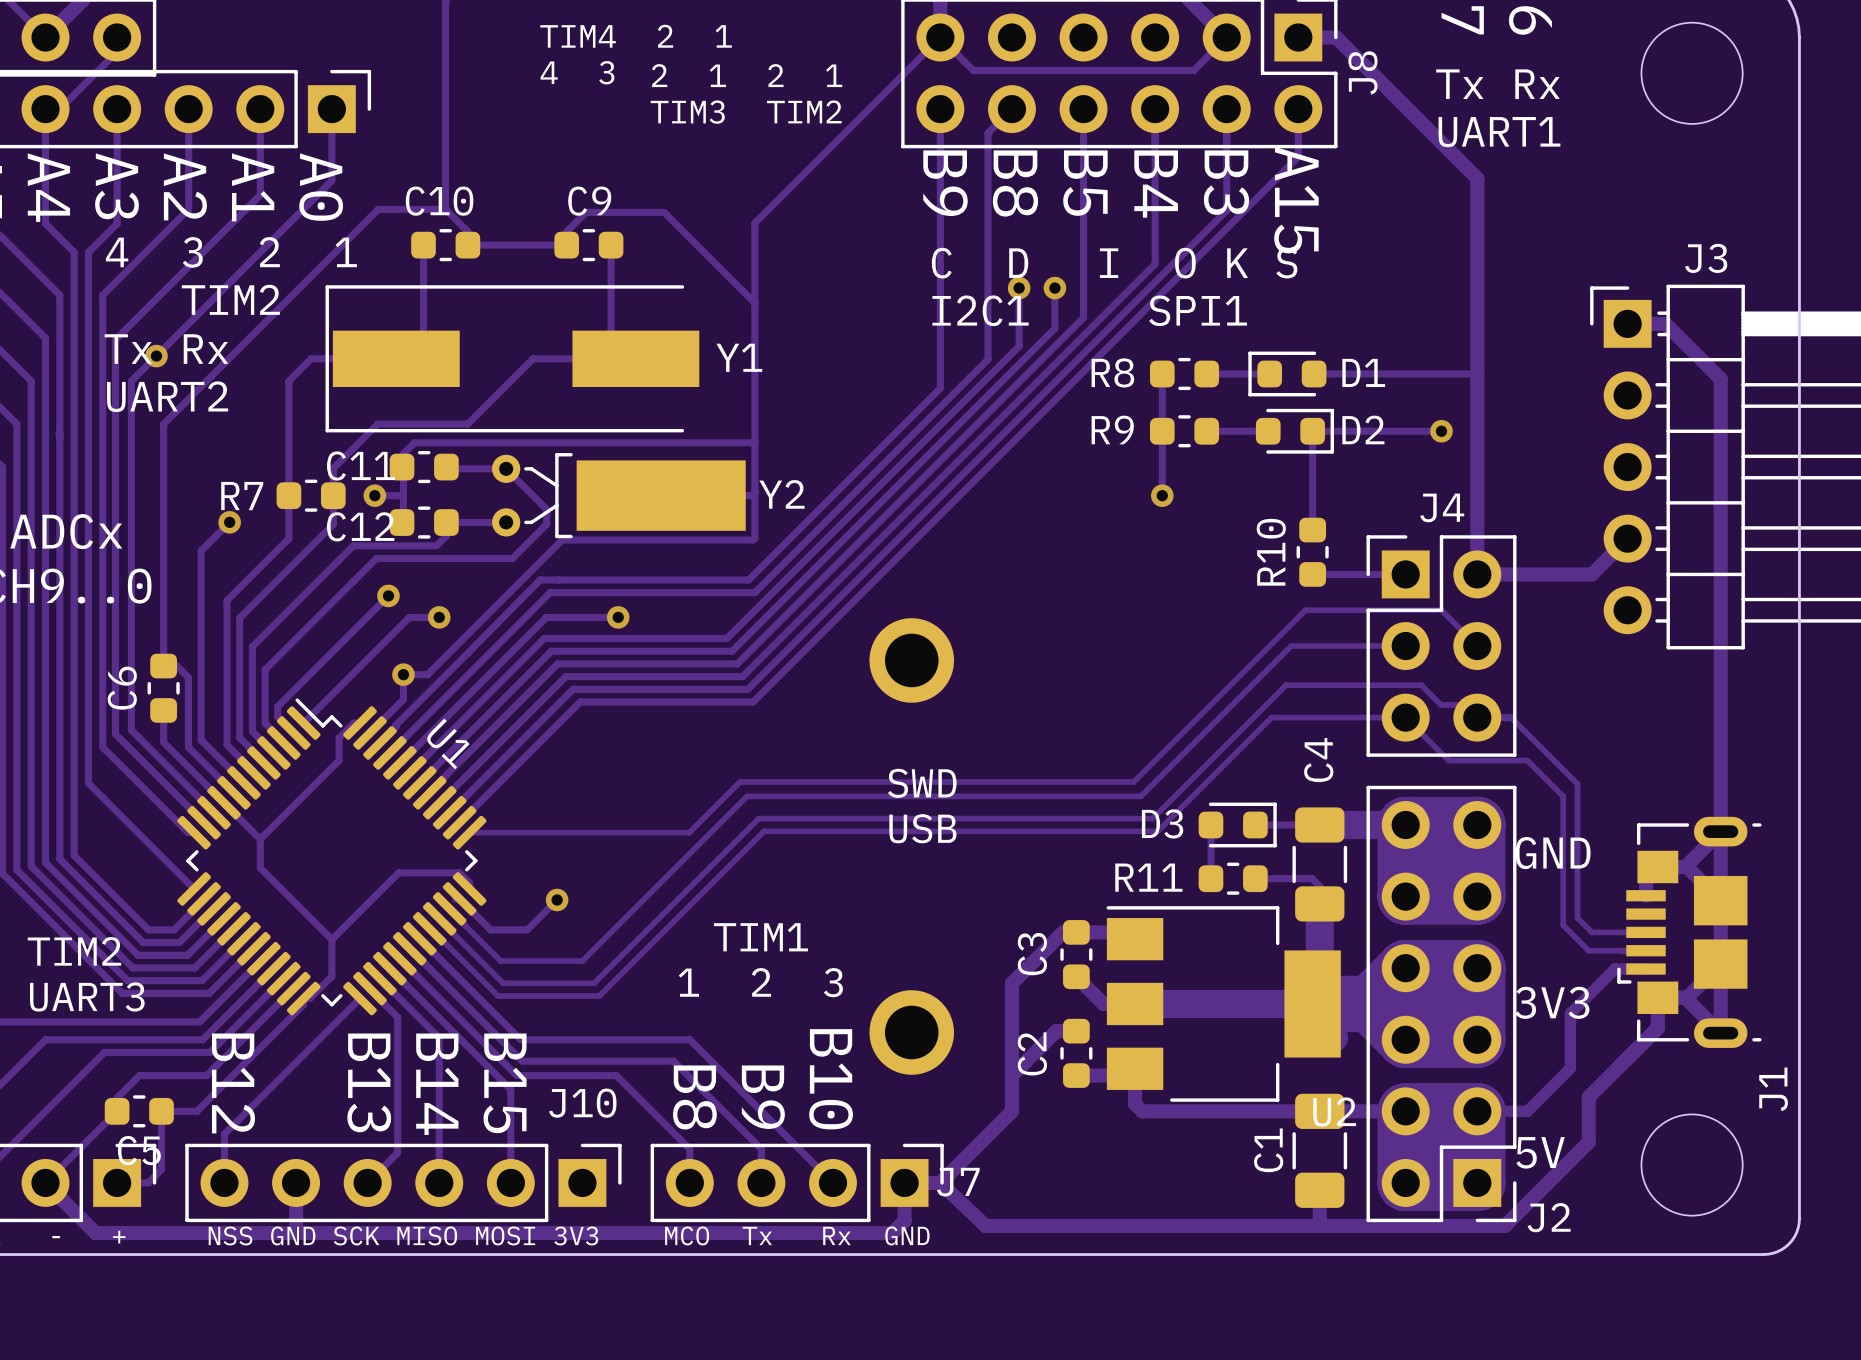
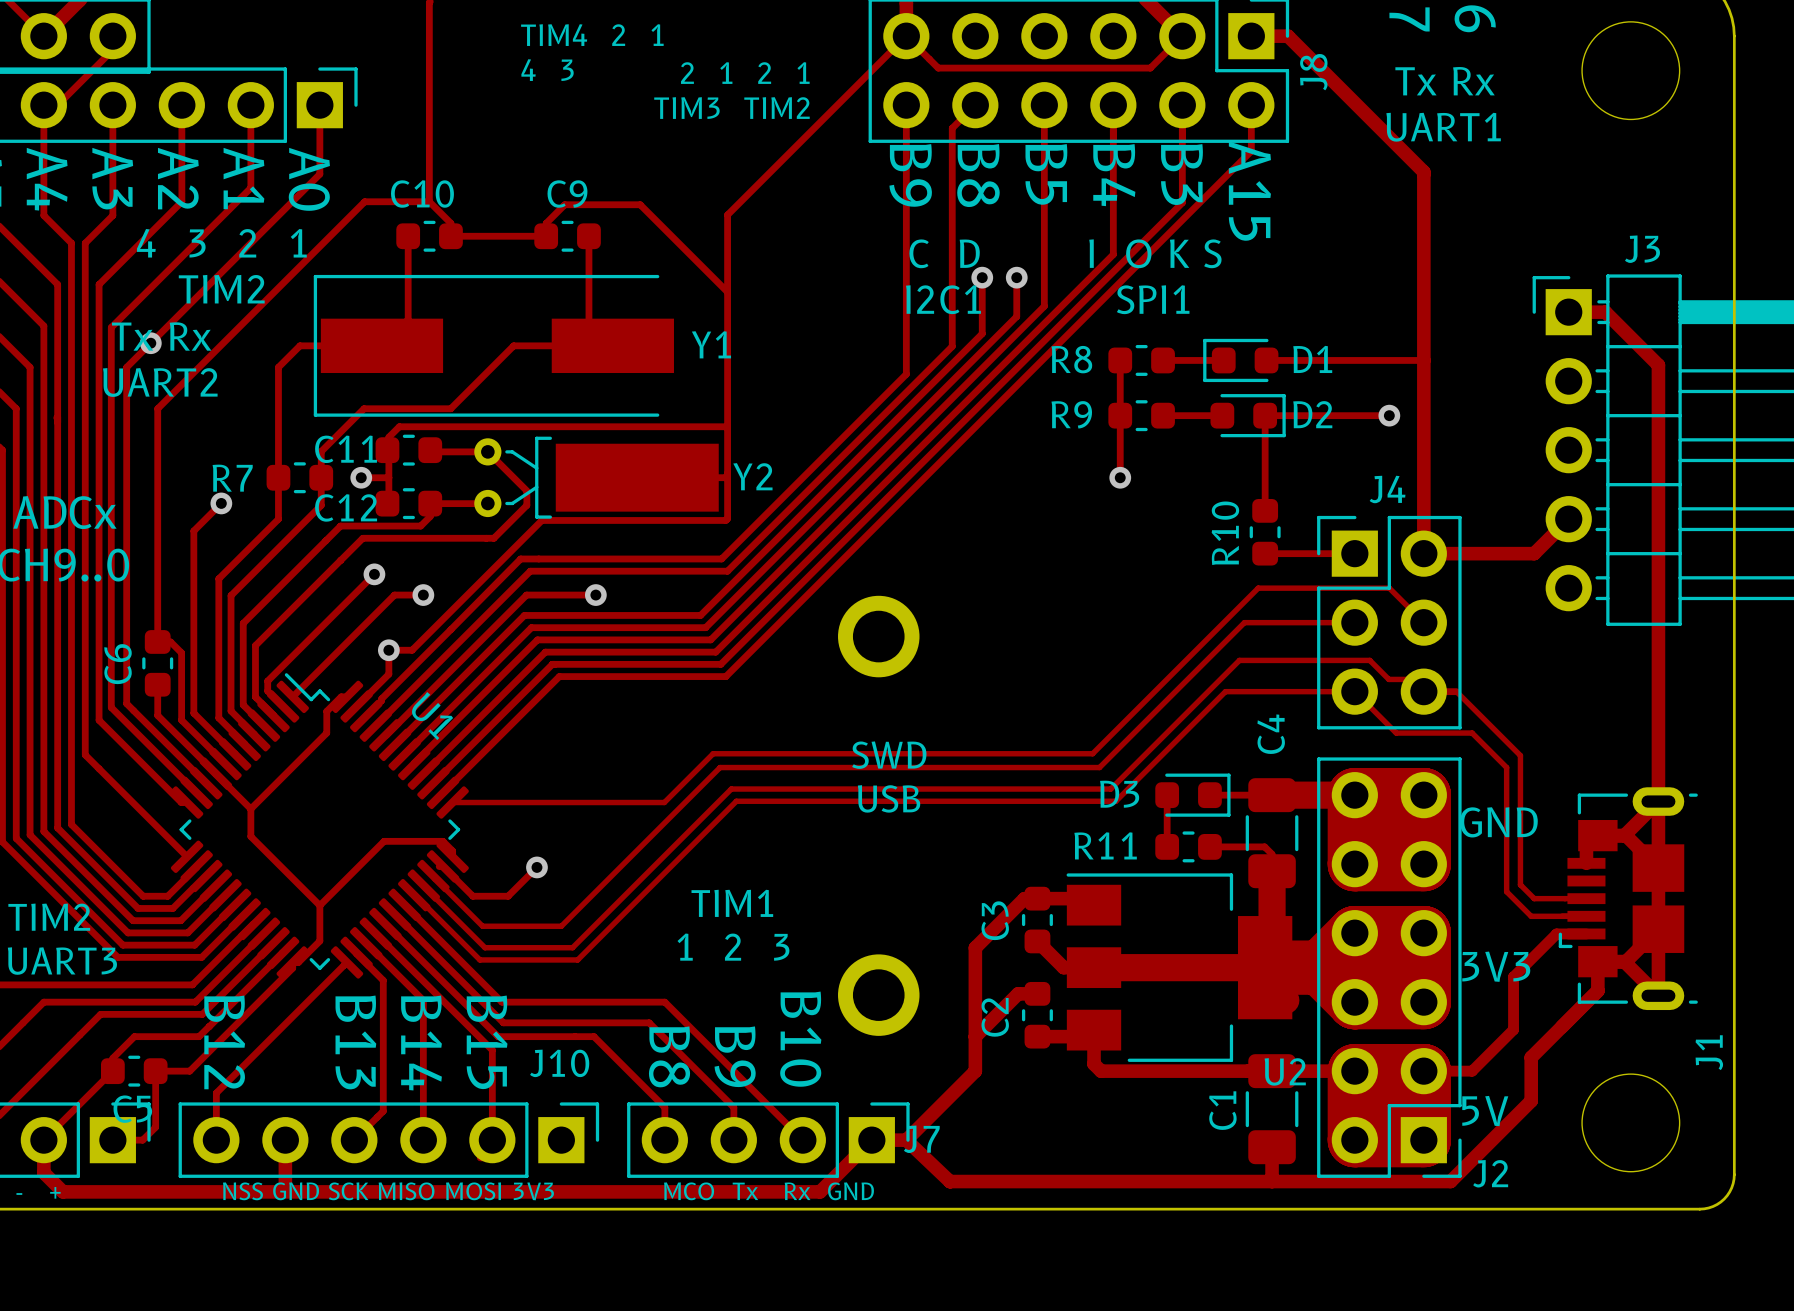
track: (45, 1182) (95, 1233) (892, 1233) (904, 1220) (904, 1182) -> (43, 1140) (43, 1172) (62, 1191) (820, 1191) (871, 1140)

